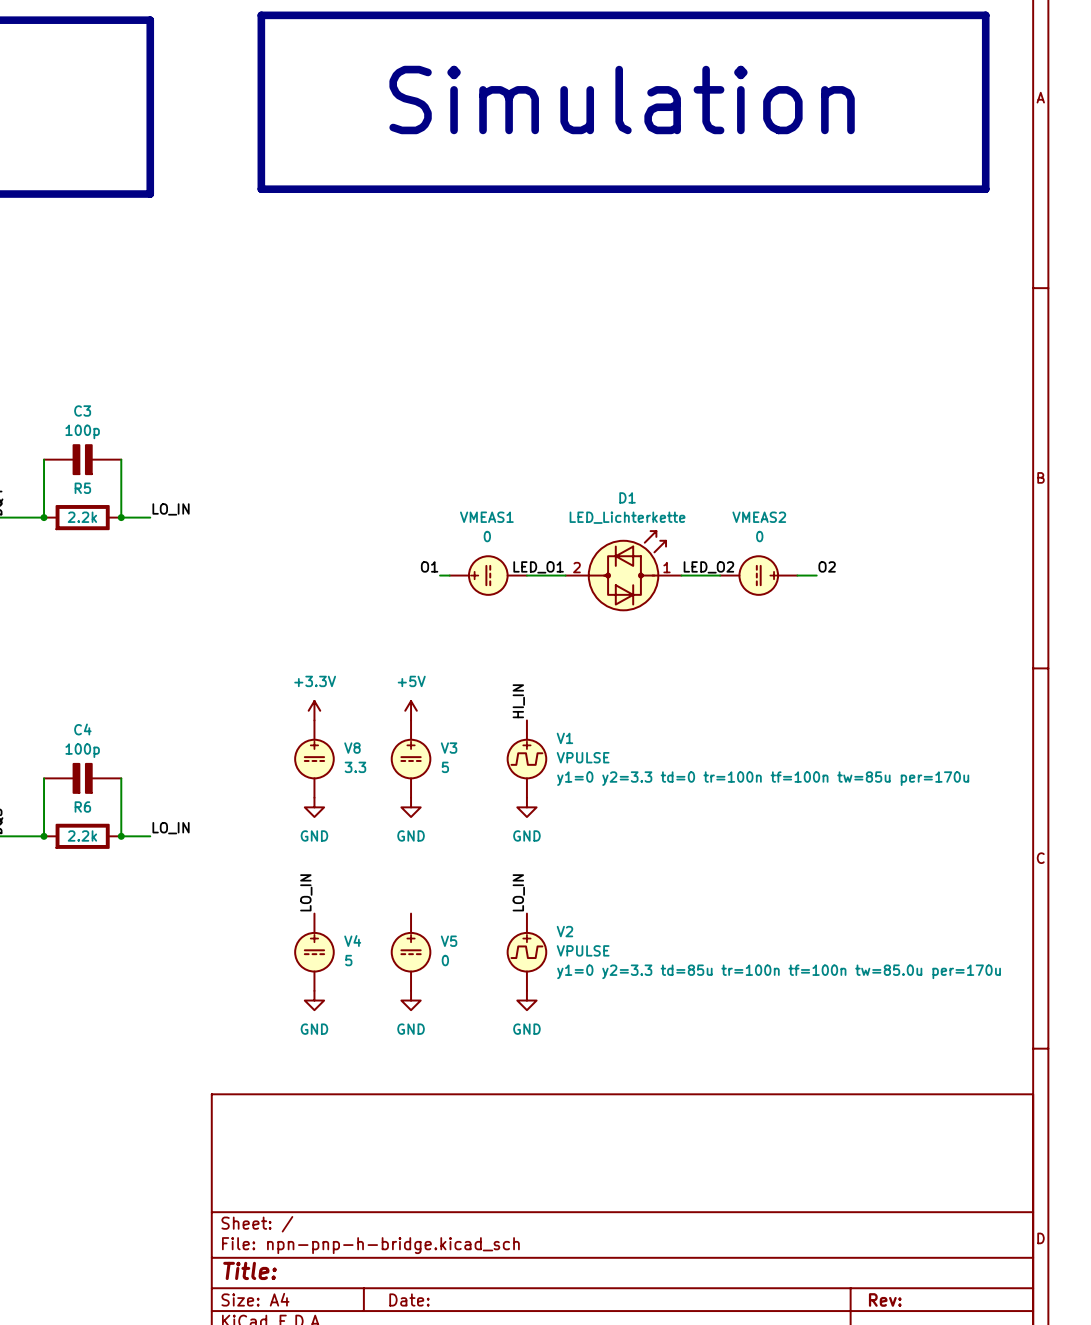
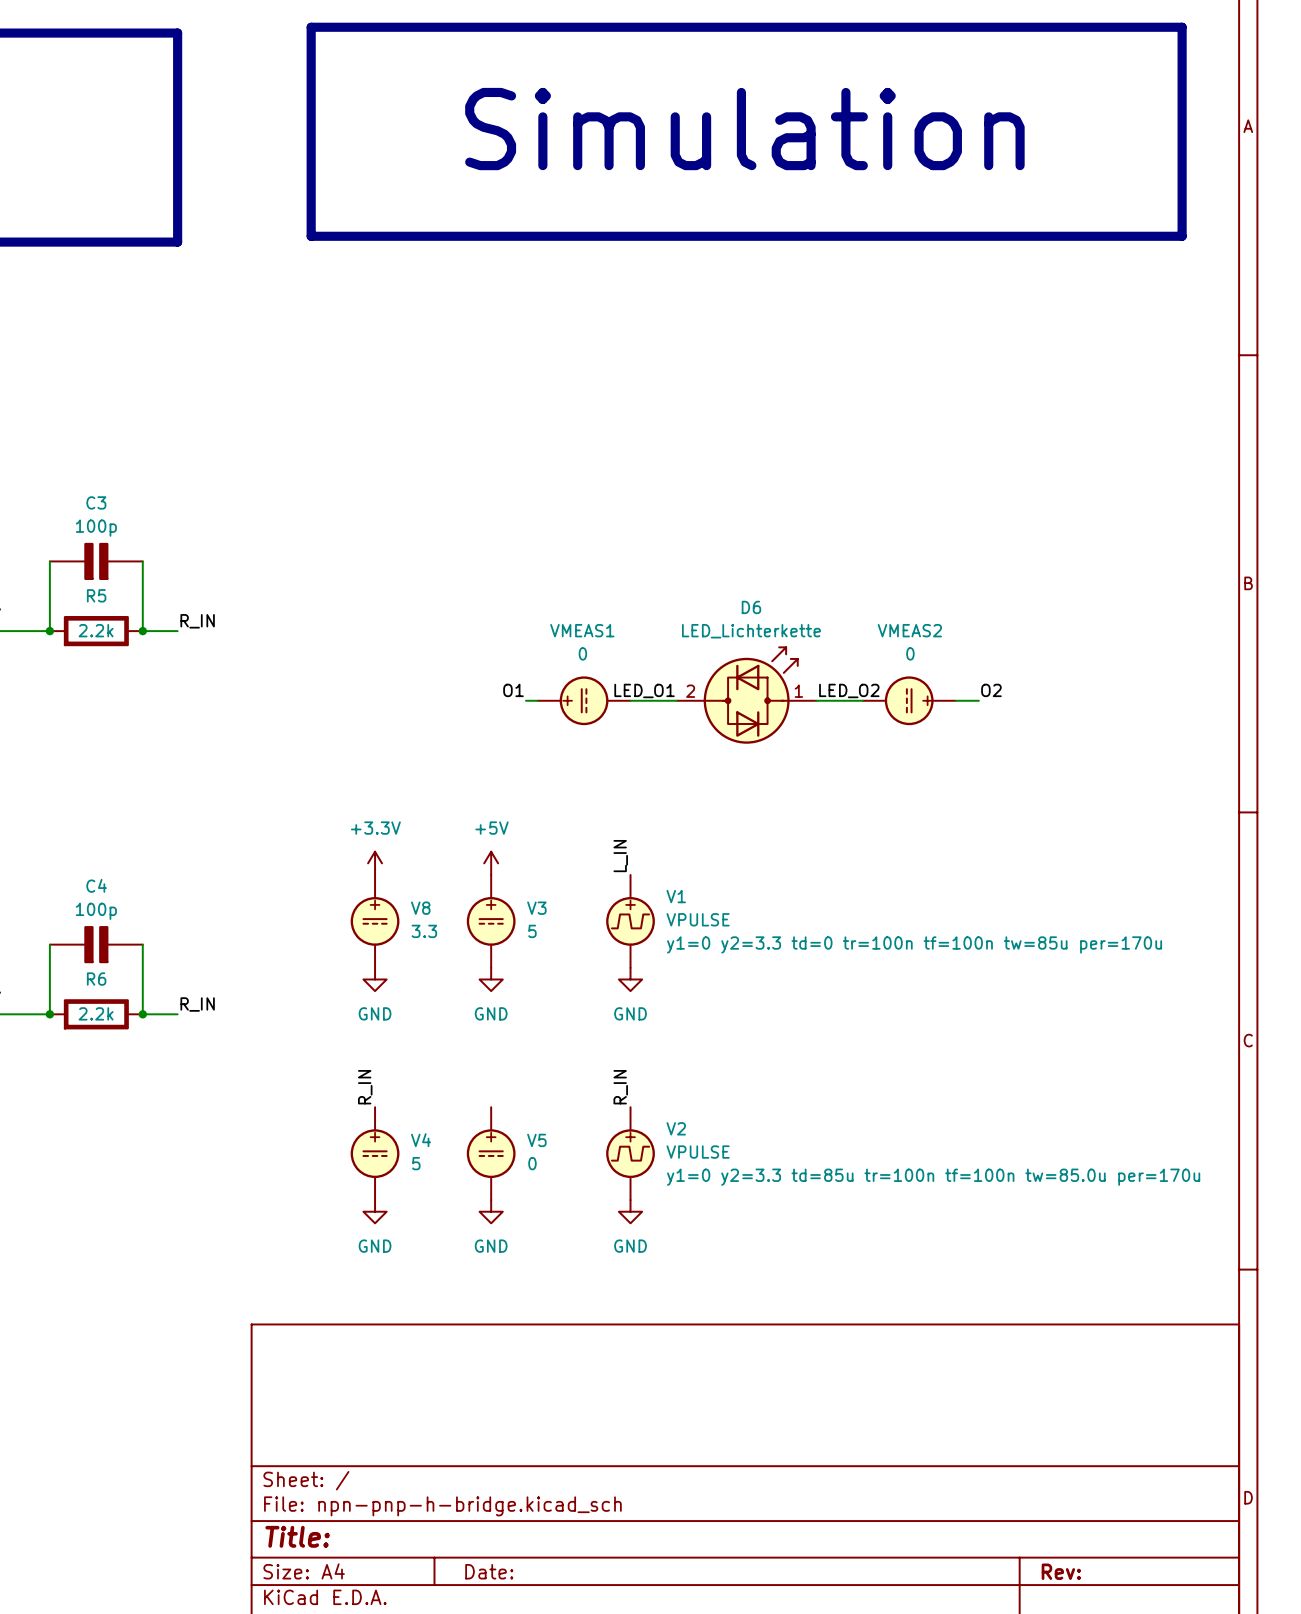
D1 name: D1 (627, 497) -> D6 (751, 607)
label: LO_IN (171, 509) -> R_IN (197, 621)
label: HI_IN (518, 701) -> L_IN (620, 856)
label: LO_IN (171, 828) -> R_IN (197, 1004)
label: LO_IN (306, 892) -> R_IN (365, 1087)
label: LO_IN (518, 892) -> R_IN (620, 1087)

